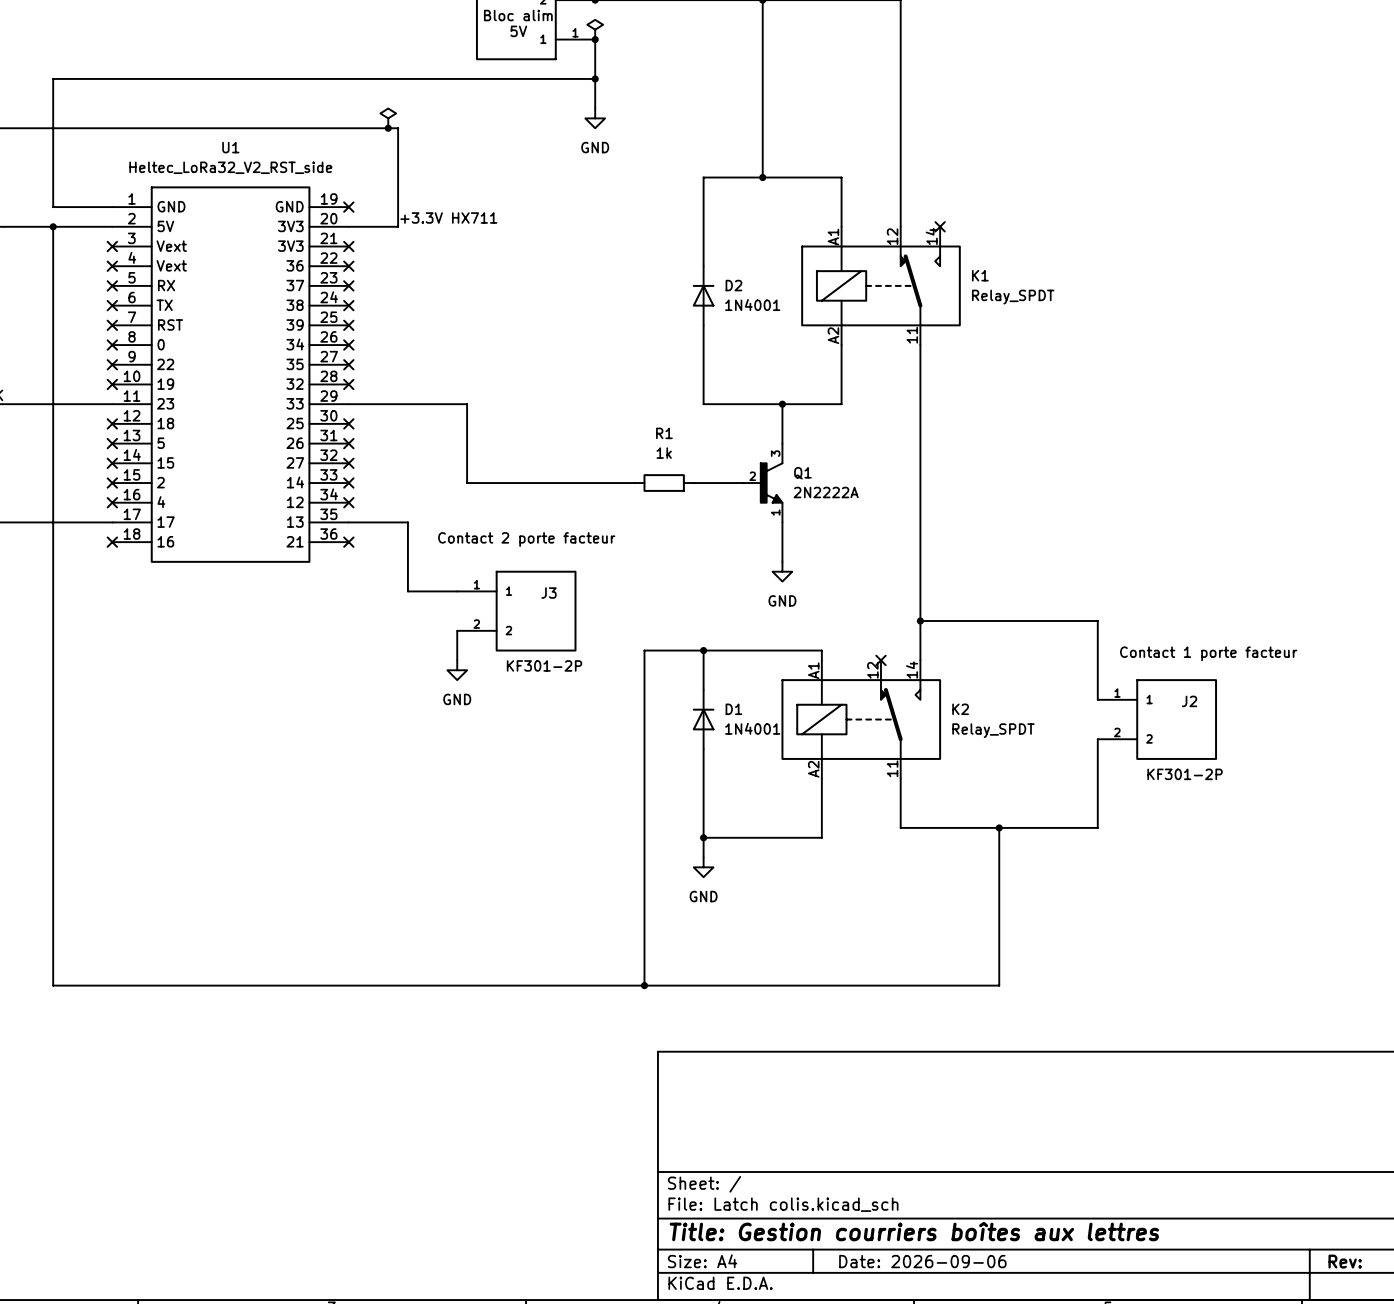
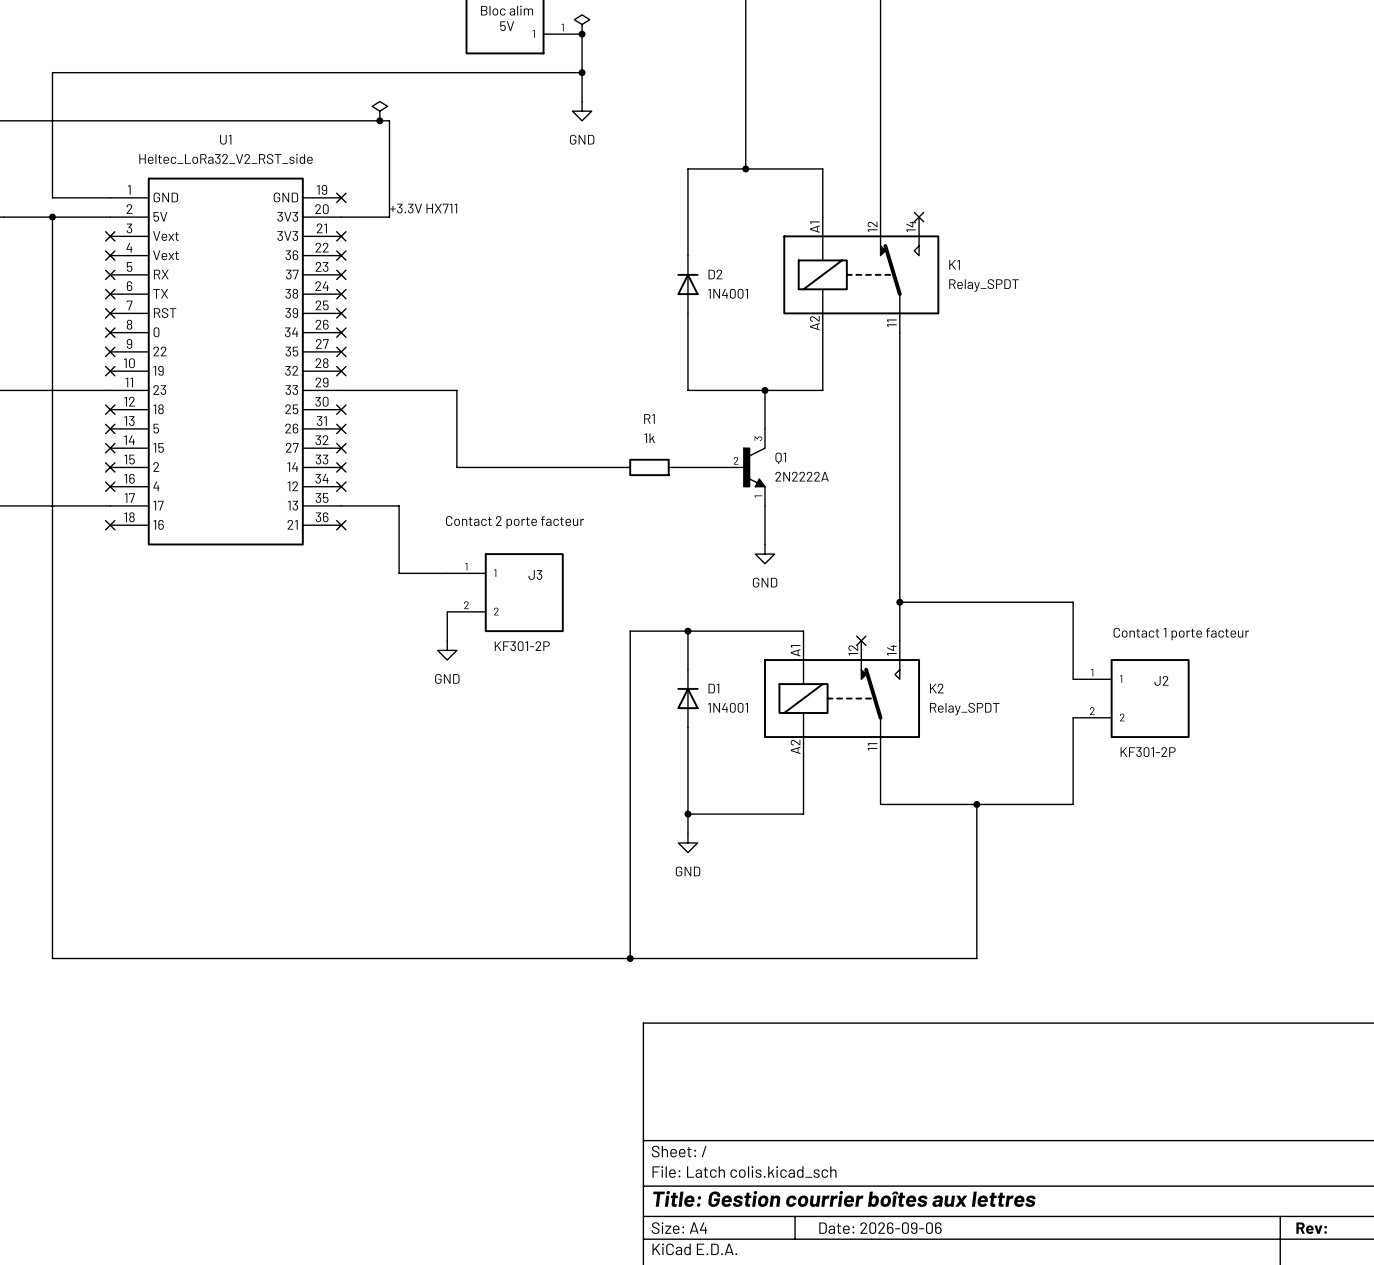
title block: Title: Gestion courriers boîtes aux lettres (914, 1231) -> Title: Gestion courrier boîtes aux lettres (844, 1198)

